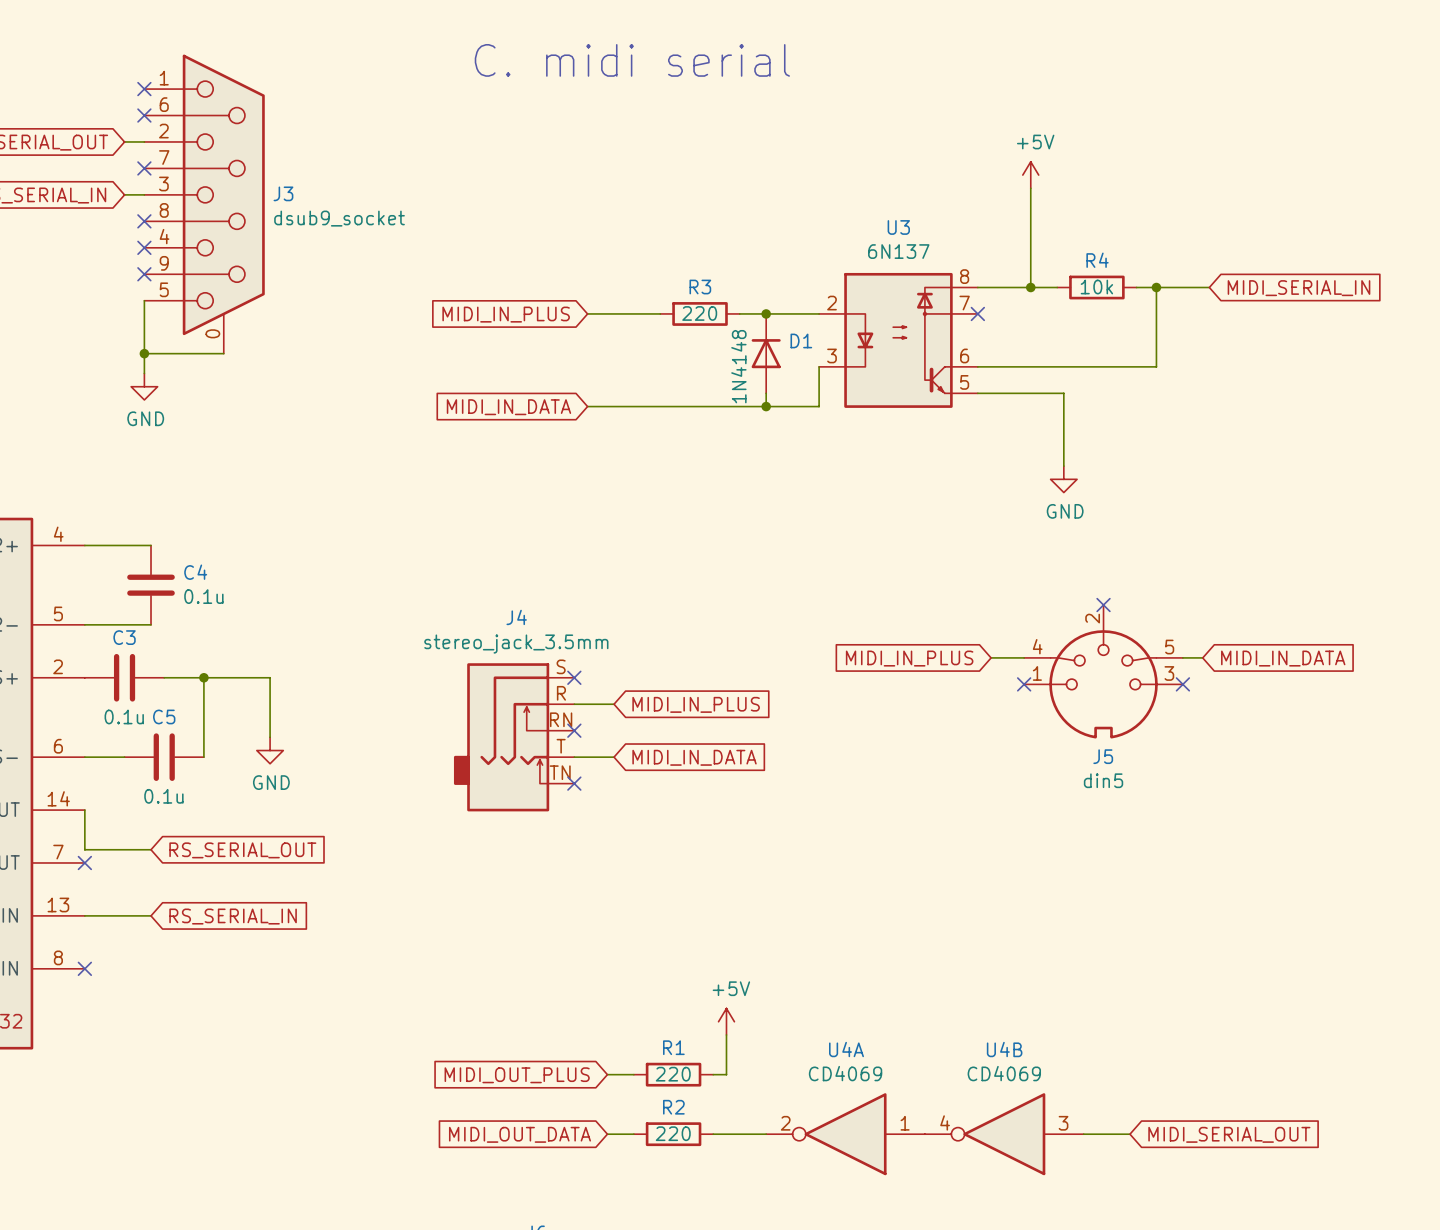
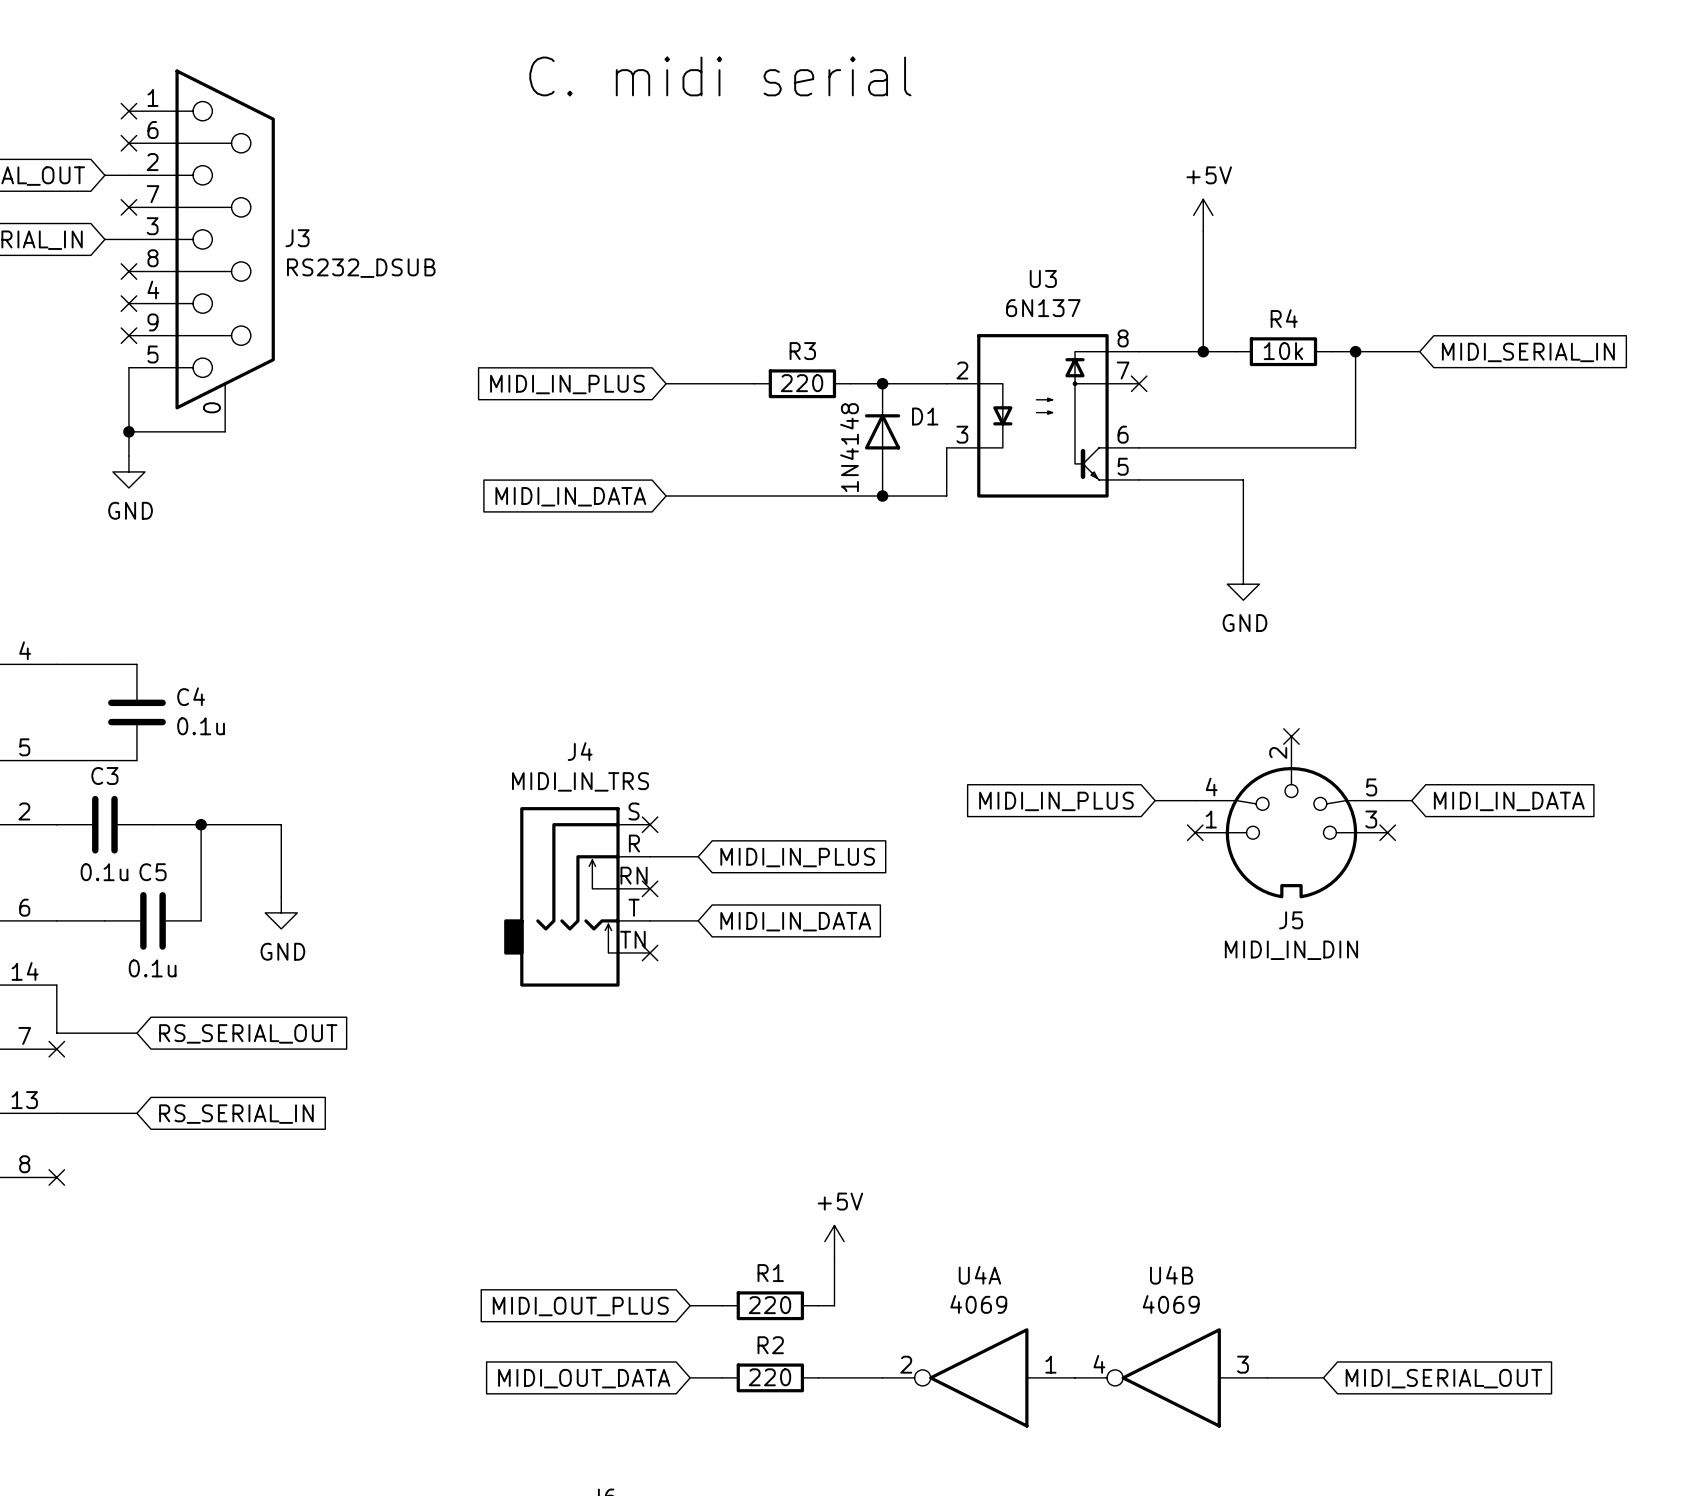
J3 value: dsub9_socket (339, 218) -> RS232_DSUB (361, 268)
J4 value: stereo_jack_3.5mm (516, 644) -> MIDI_IN_TRS (580, 781)
J5 value: din5 (1103, 780) -> MIDI_IN_DIN (1291, 950)
U4A value: CD4069 (845, 1073) -> 4069 (978, 1304)
U4B value: CD4069 (1004, 1073) -> 4069 (1171, 1304)

